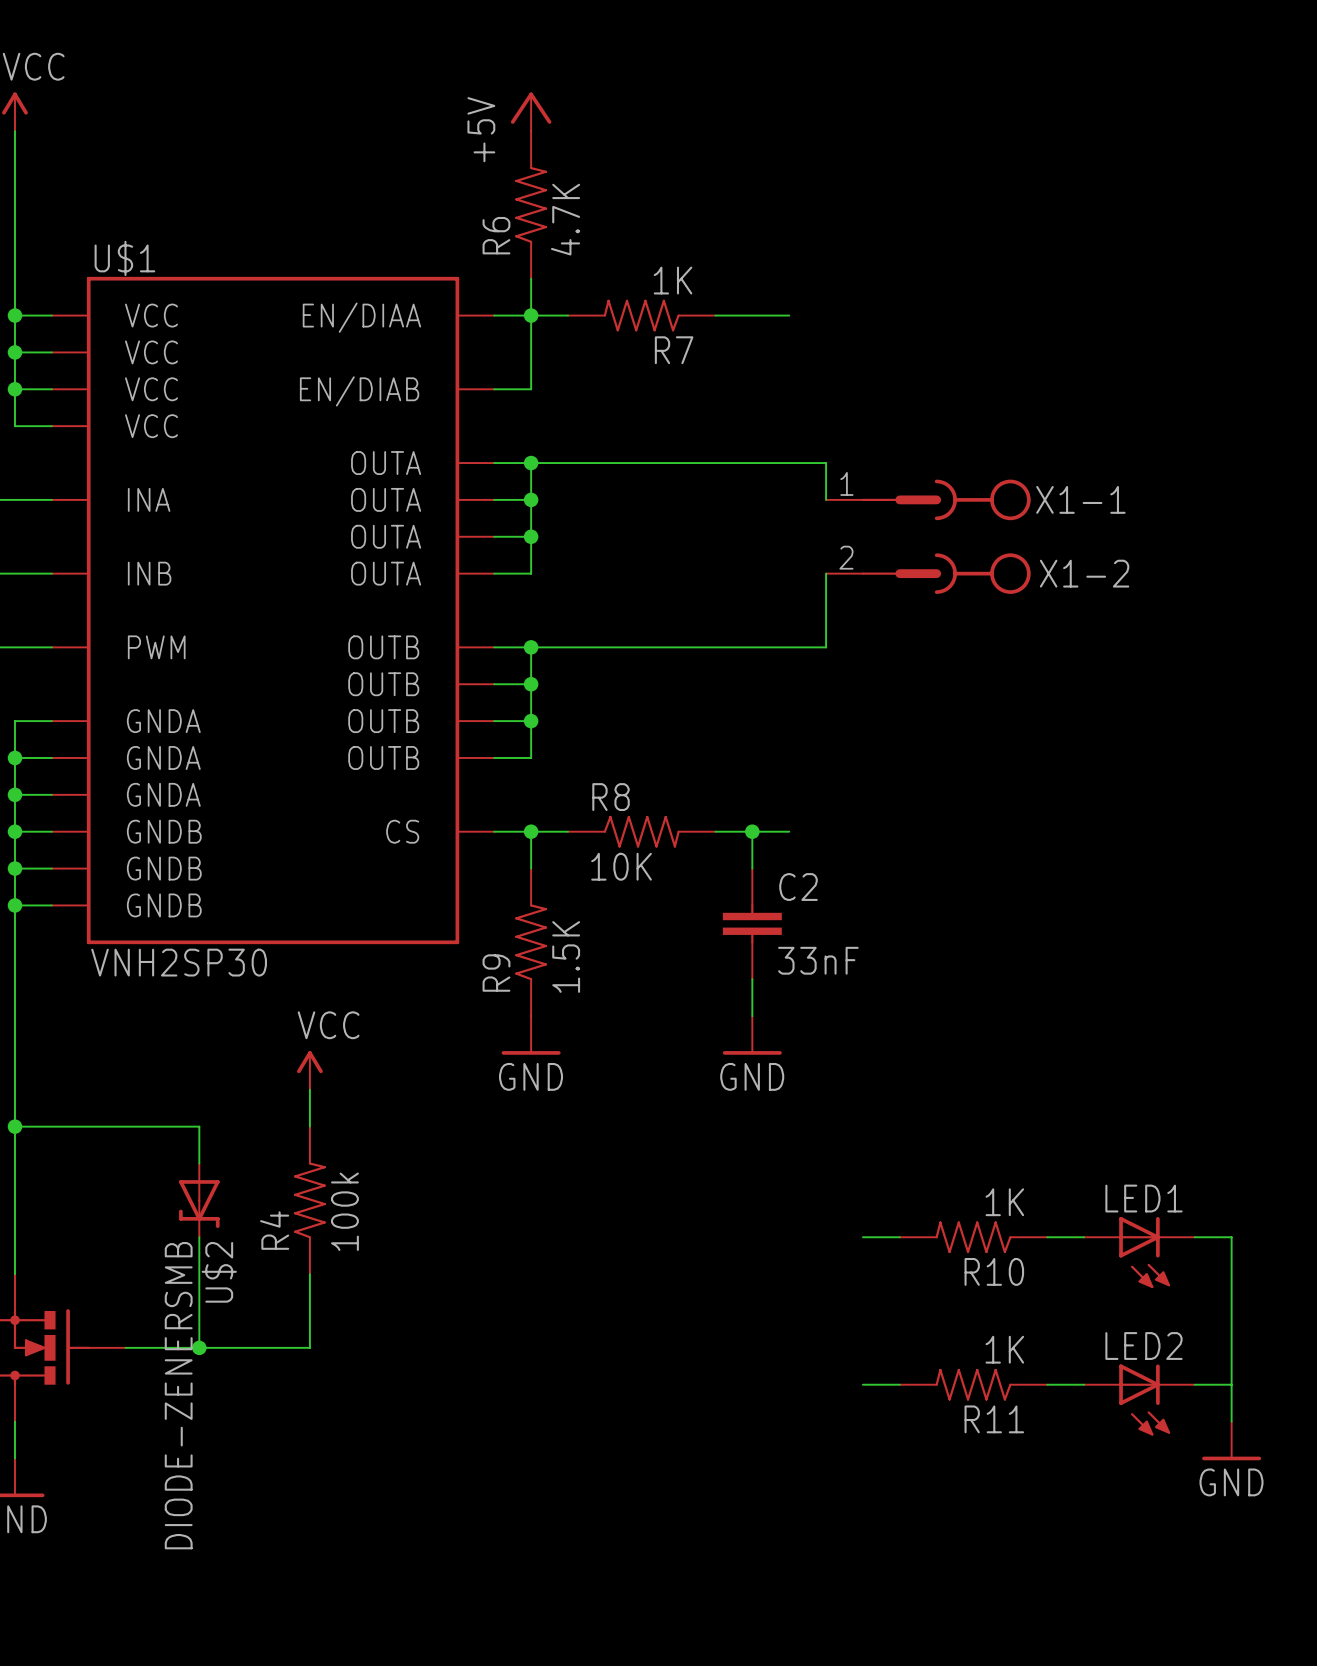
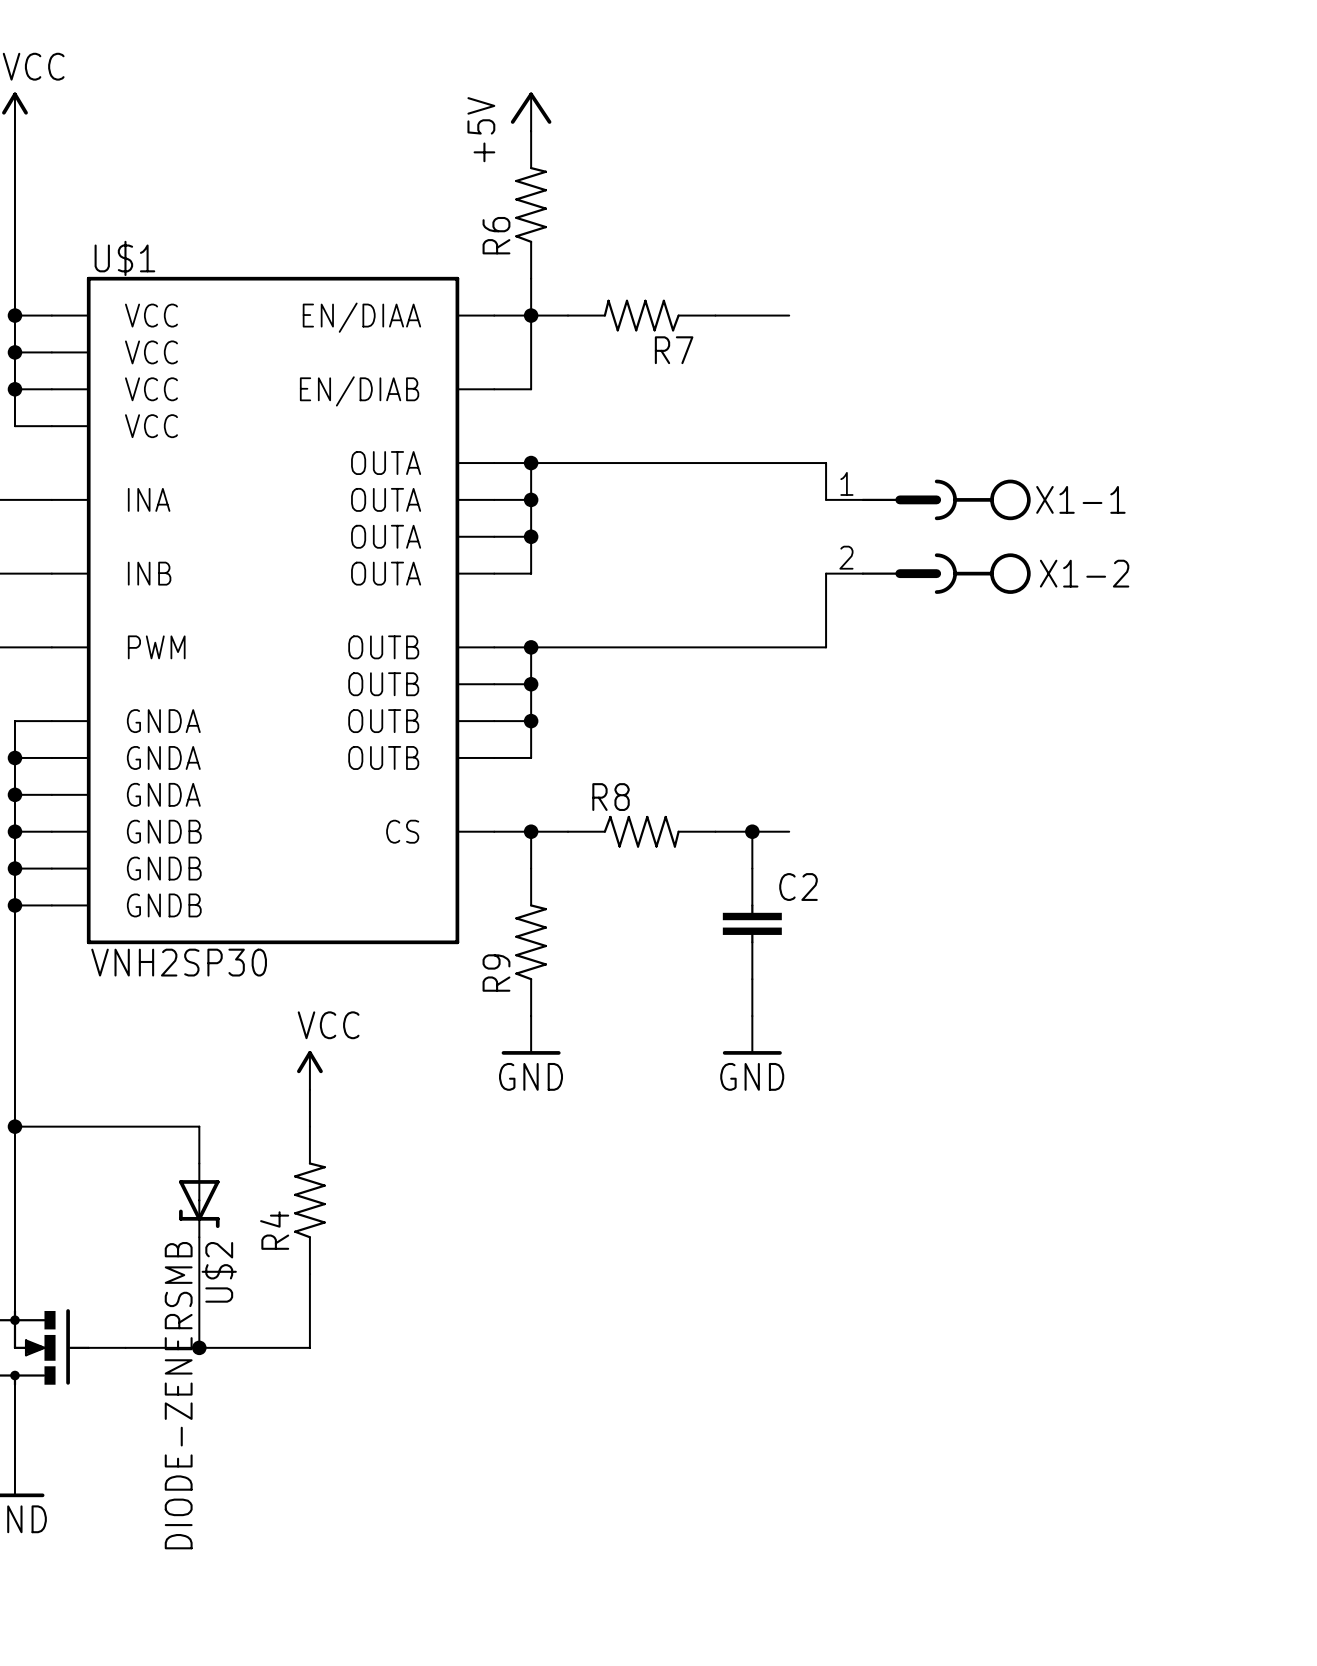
R6 value: 4.7K (565, 219) -> none
R7 value: 1K (673, 280) -> none
R8 value: 10K (621, 866) -> none
R9 value: 1.5K (566, 956) -> none
C2 value: 33nF (818, 960) -> none
R4 value: 100k (344, 1211) -> none
wire: (862, 1237) (899, 1237) -> none
R10: 1K (973, 1237) -> none
wire: (1047, 1237) (1084, 1237) -> none
wire: (1194, 1237) (1231, 1237) (1231, 1421) -> none
LED1: (1139, 1252) -> none
wire: (862, 1384) (899, 1384) -> none
R11: 1K (973, 1384) -> none
wire: (1047, 1384) (1084, 1384) -> none
wire: (1194, 1384) (1231, 1384) -> none
LED2: (1139, 1400) -> none
power symbol: GND (1231, 1440) -> none

